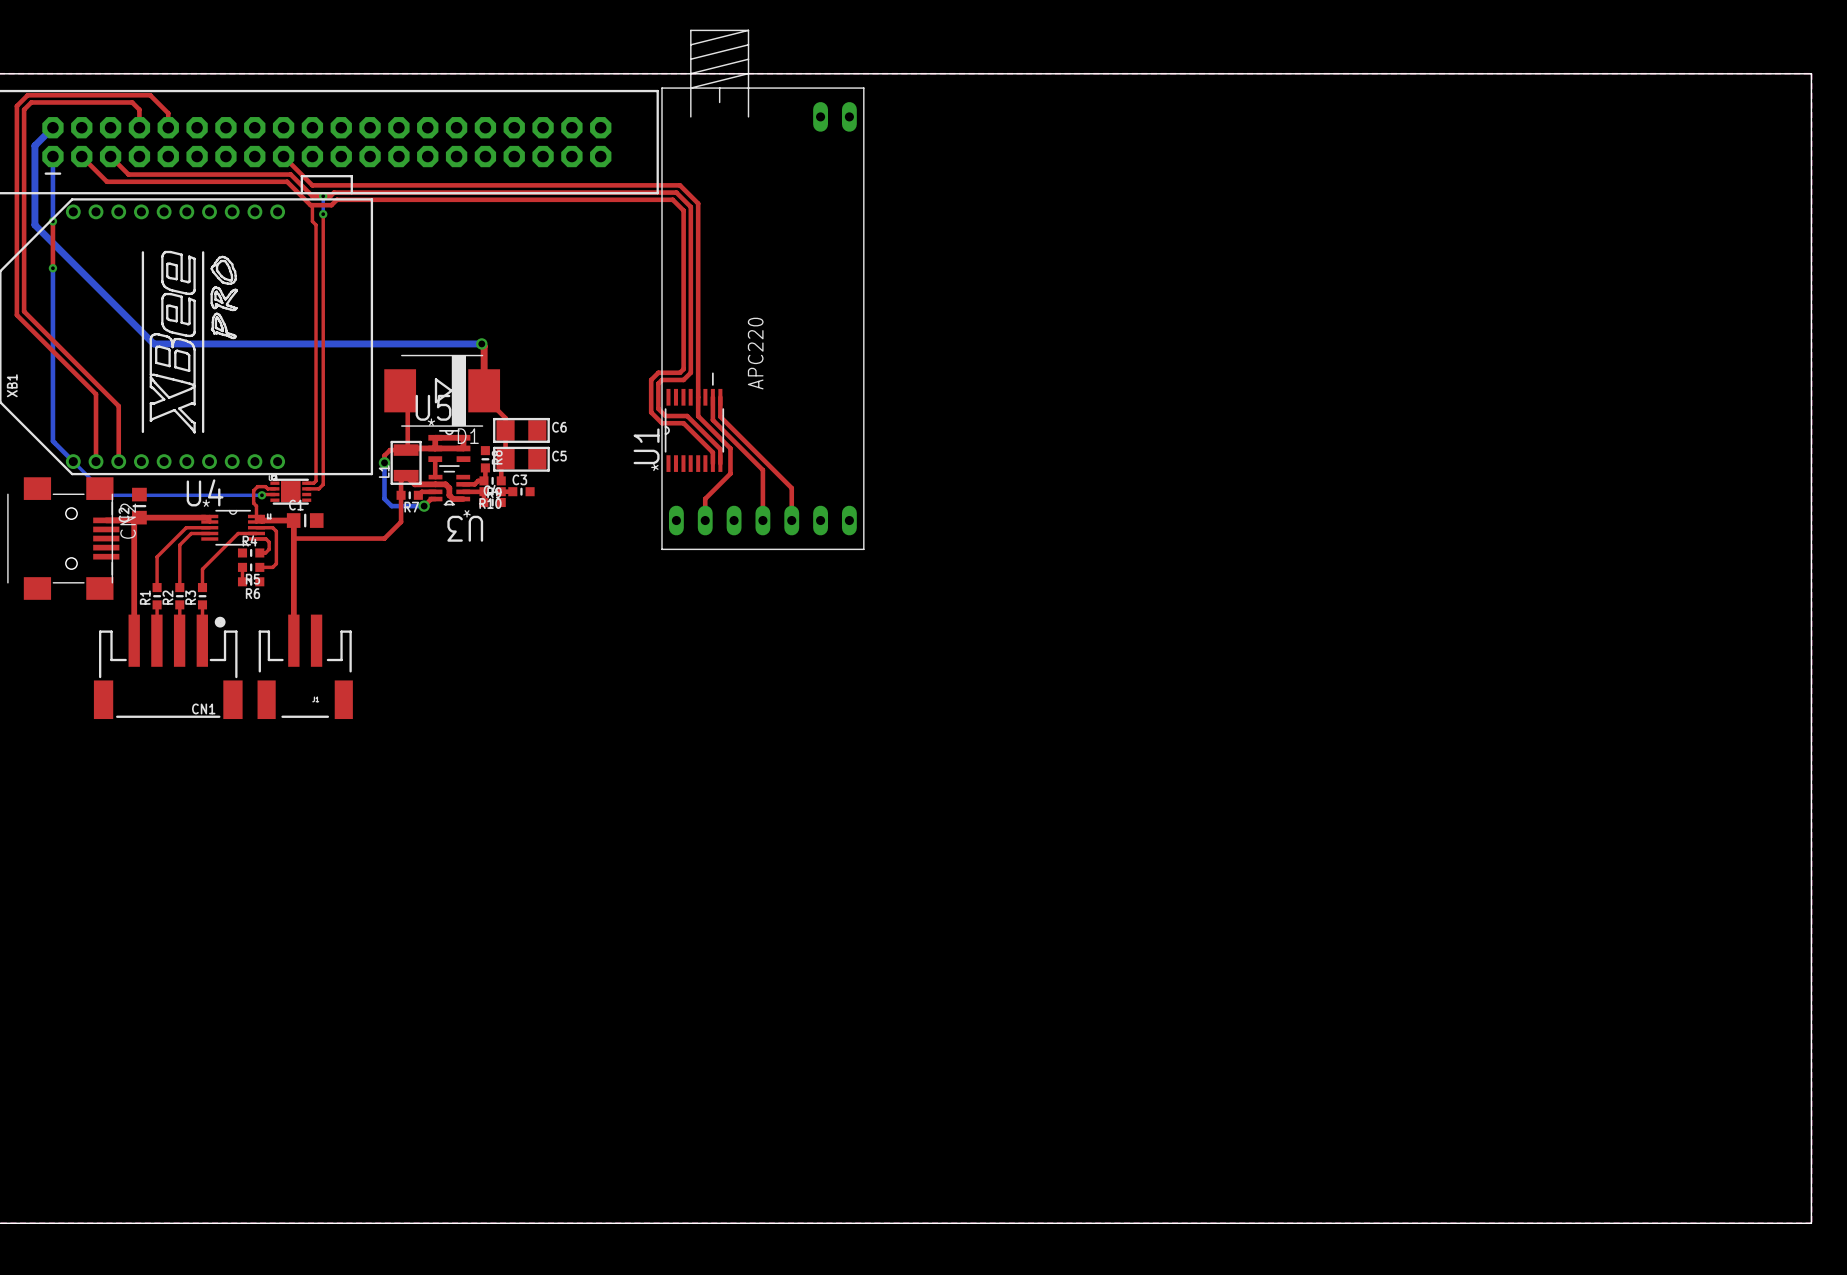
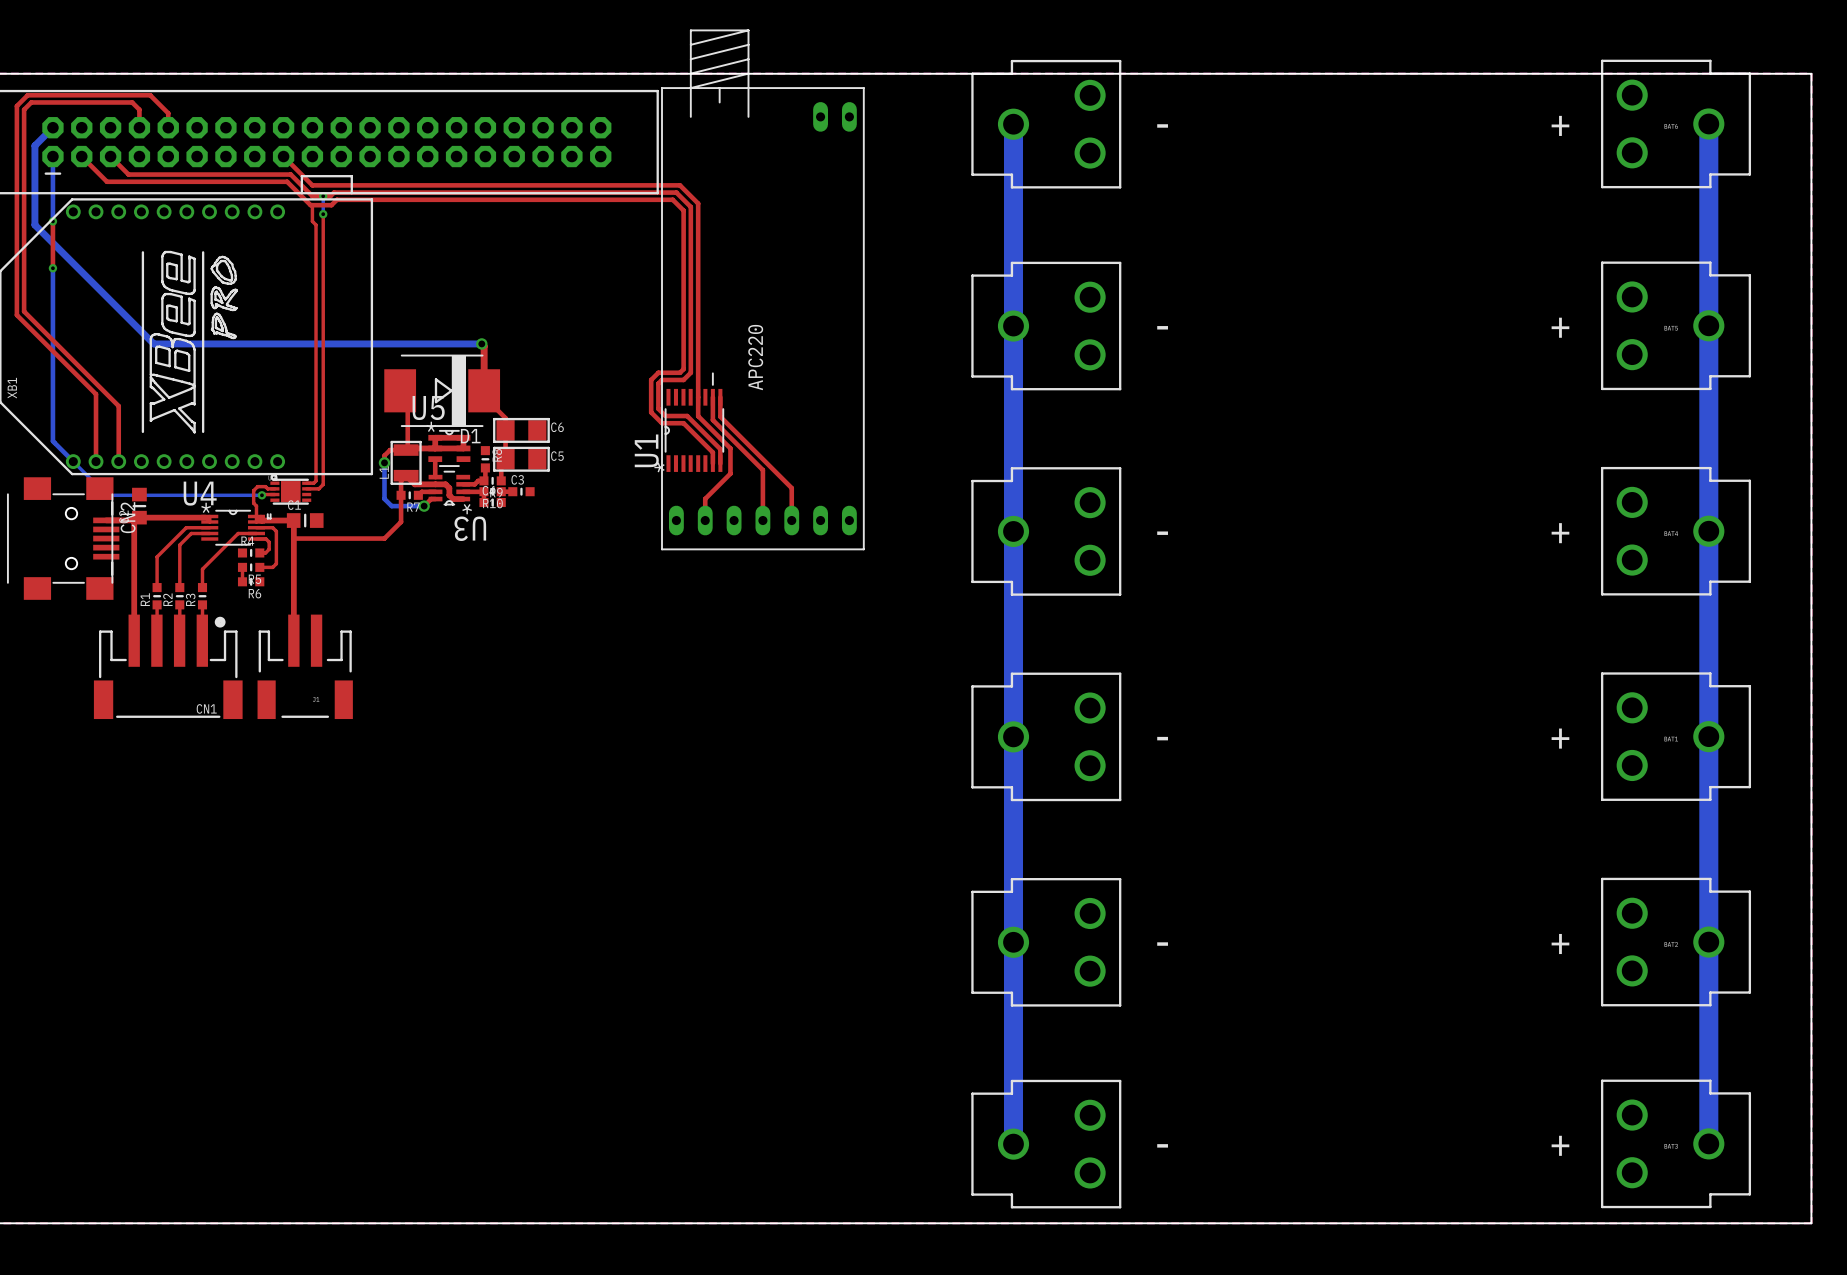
bottom track: none -> (1708, 123) (1708, 1143)
bottom track: none -> (1013, 124) (1013, 1144)
part: none -> (1361, 124)
part: none -> (1361, 325)
part: none -> (1361, 531)
part: none -> (1361, 736)
part: none -> (1361, 942)
part: none -> (1361, 1144)

